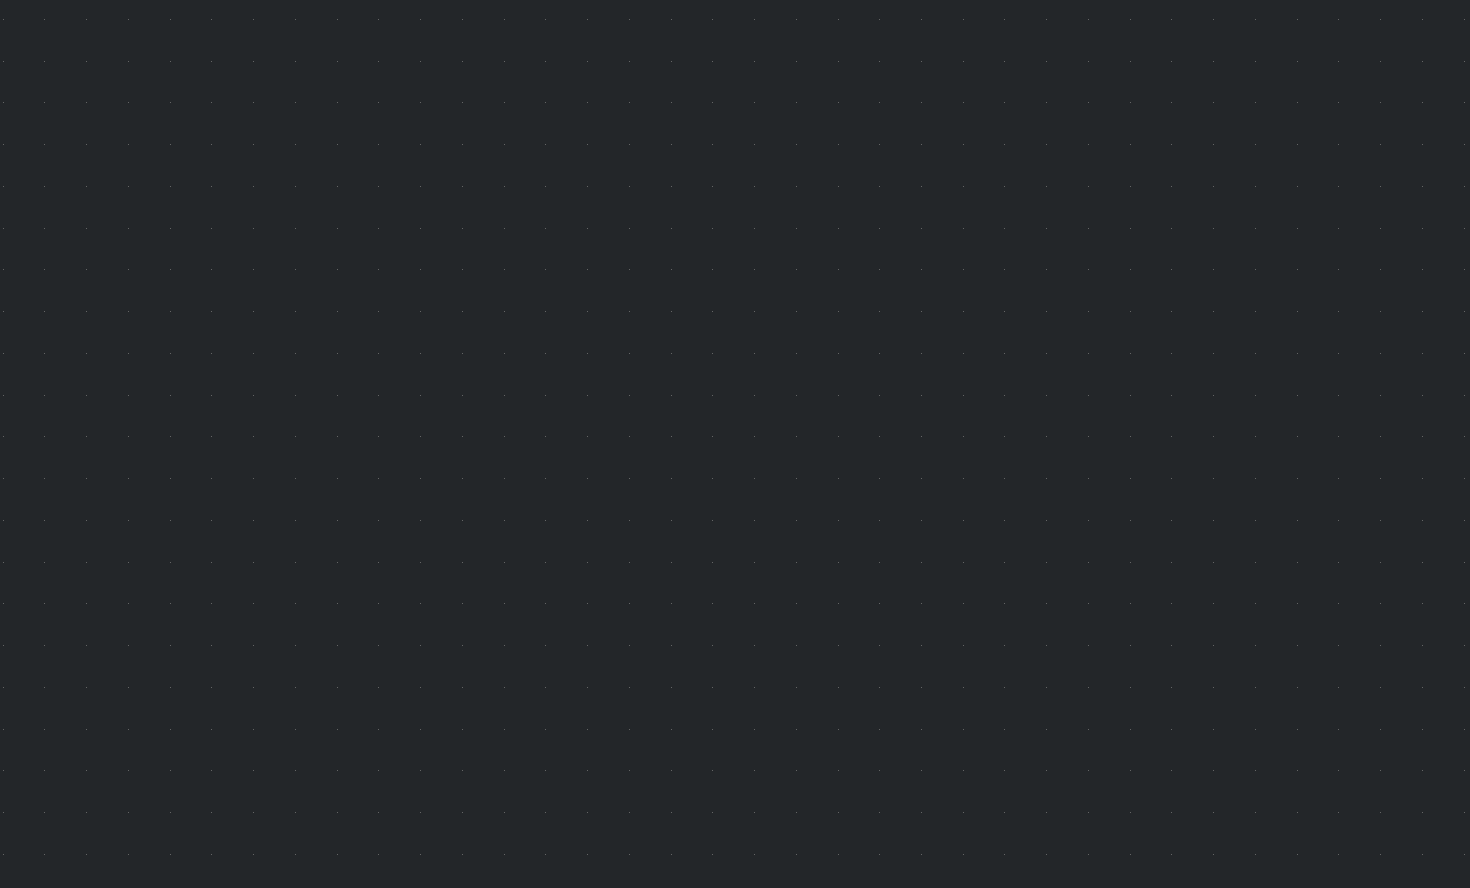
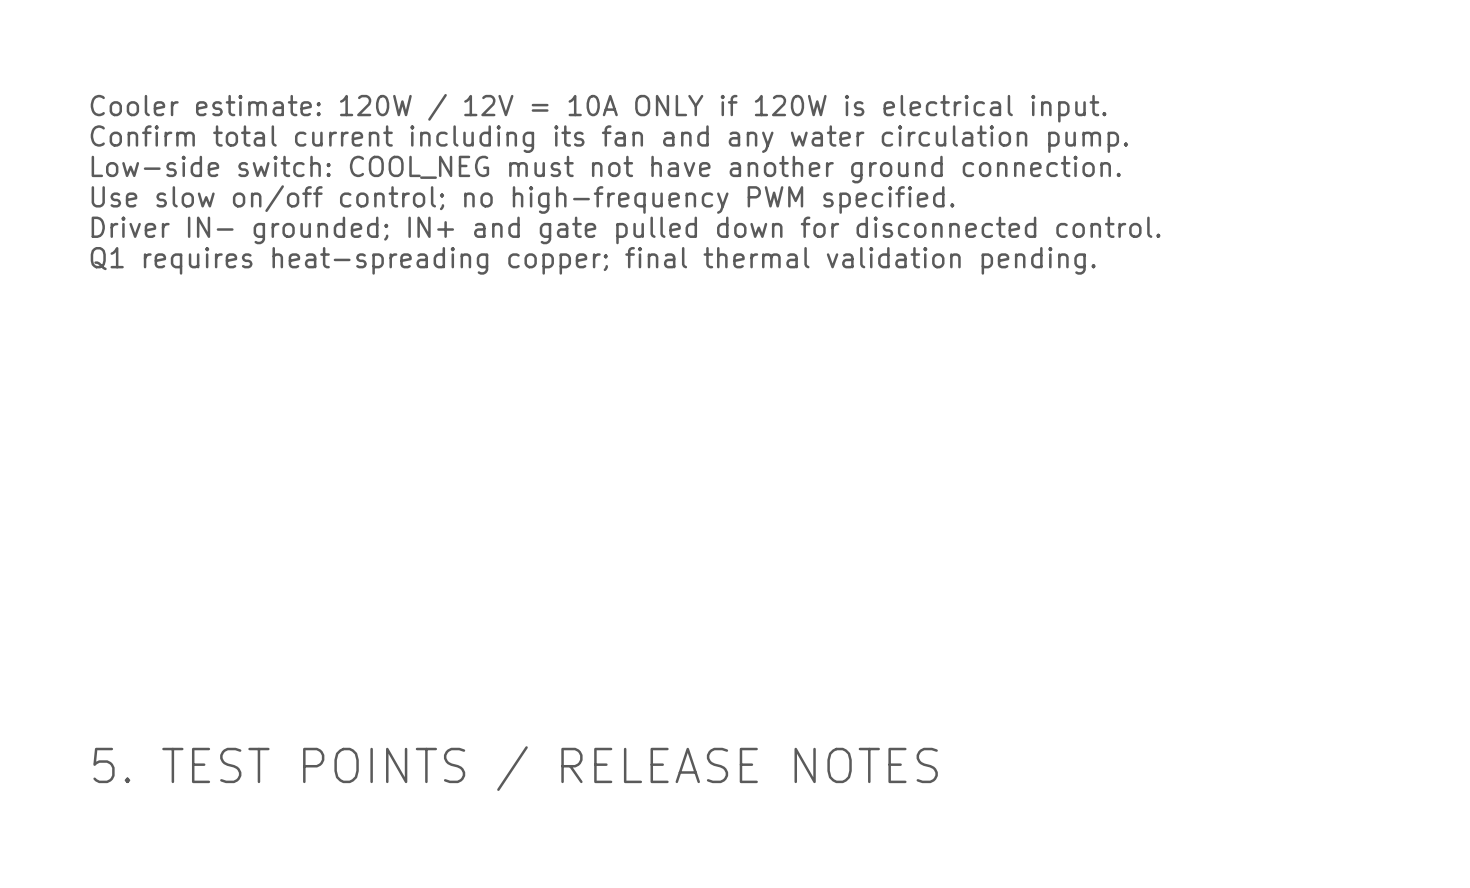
text: none -> Cooler estimate: 120W / 12V = 10A ONLY if 120W is electrical input. (598, 108)
text: none -> Confirm total current including its fan and any water circulation pump. (609, 139)
text: none -> Low-side switch: COOL_NEG must not have another ground connection. (606, 169)
text: none -> Use slow on/off control; no high-frequency PWM specified. (523, 199)
text: none -> Driver IN- grounded; IN+ and gate pulled down for disconnected control. (626, 230)
text: none -> Q1 requires heat-spreading copper; final thermal validation pending. (593, 260)
text: none -> 5. TEST POINTS / RELEASE NOTES (515, 768)

